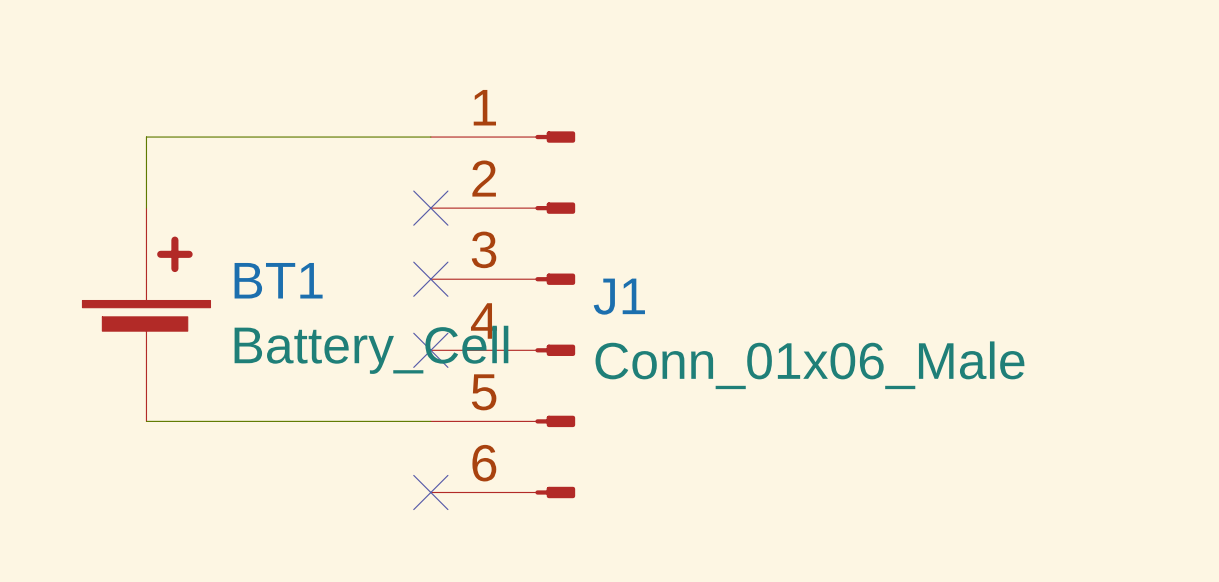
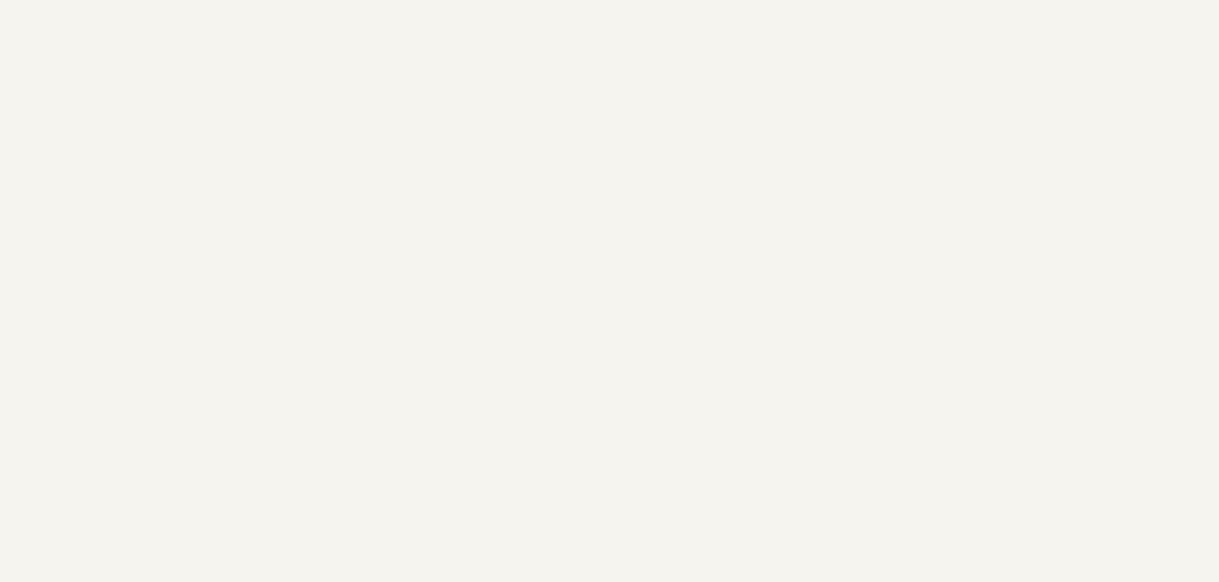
wire: (430, 137) (146, 137) (146, 208) -> none
no-connect mark: (430, 208) -> none
no-connect mark: (430, 279) -> none
BT1: Battery_Cell (146, 314) -> none
J1: Conn_01x06_Male (502, 314) -> none
no-connect mark: (430, 350) -> none
wire: (146, 421) (430, 421) -> none
no-connect mark: (430, 492) -> none

